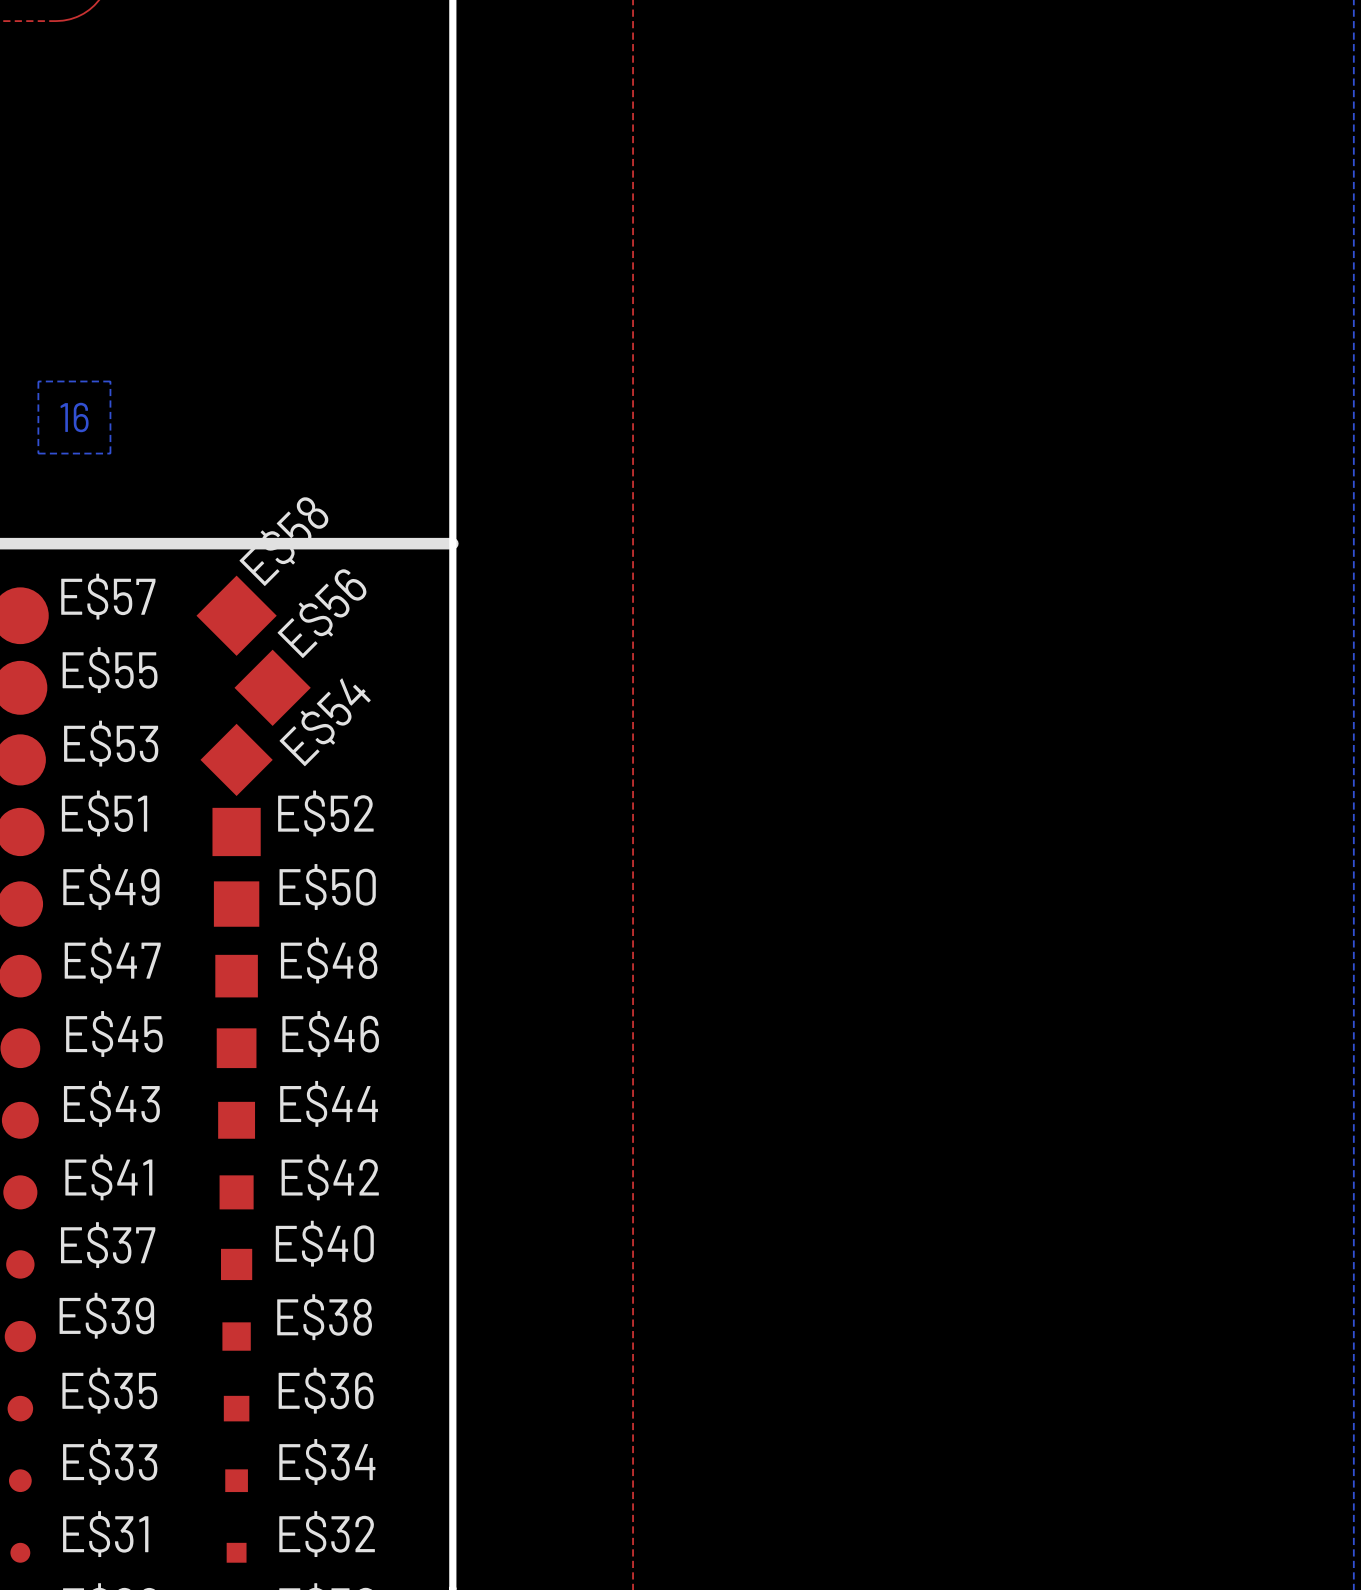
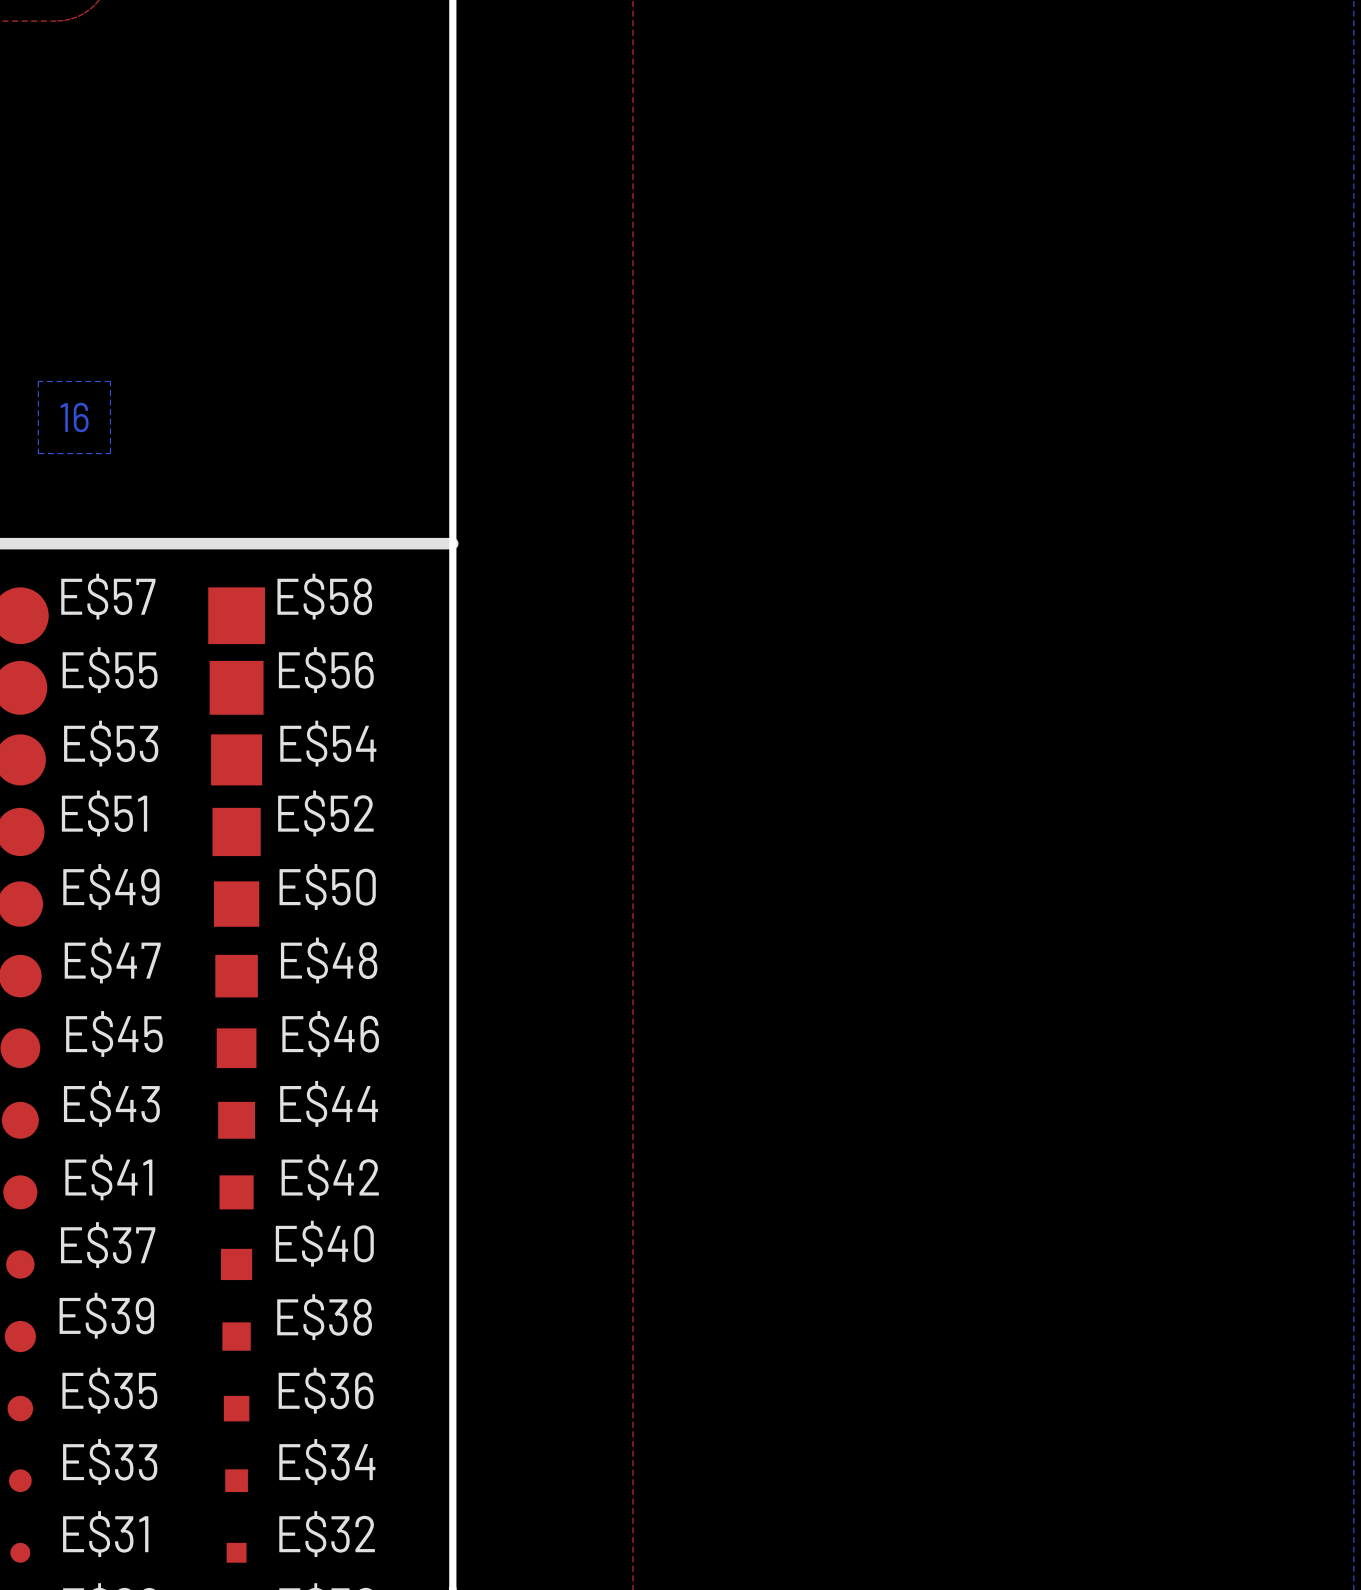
E$58 rotation: 0° (236, 615) -> 45° clockwise (236, 615)
E$56 rotation: 0° (272, 687) -> 45° clockwise (236, 687)
E$54 rotation: 0° (236, 759) -> 45° clockwise (236, 759)

